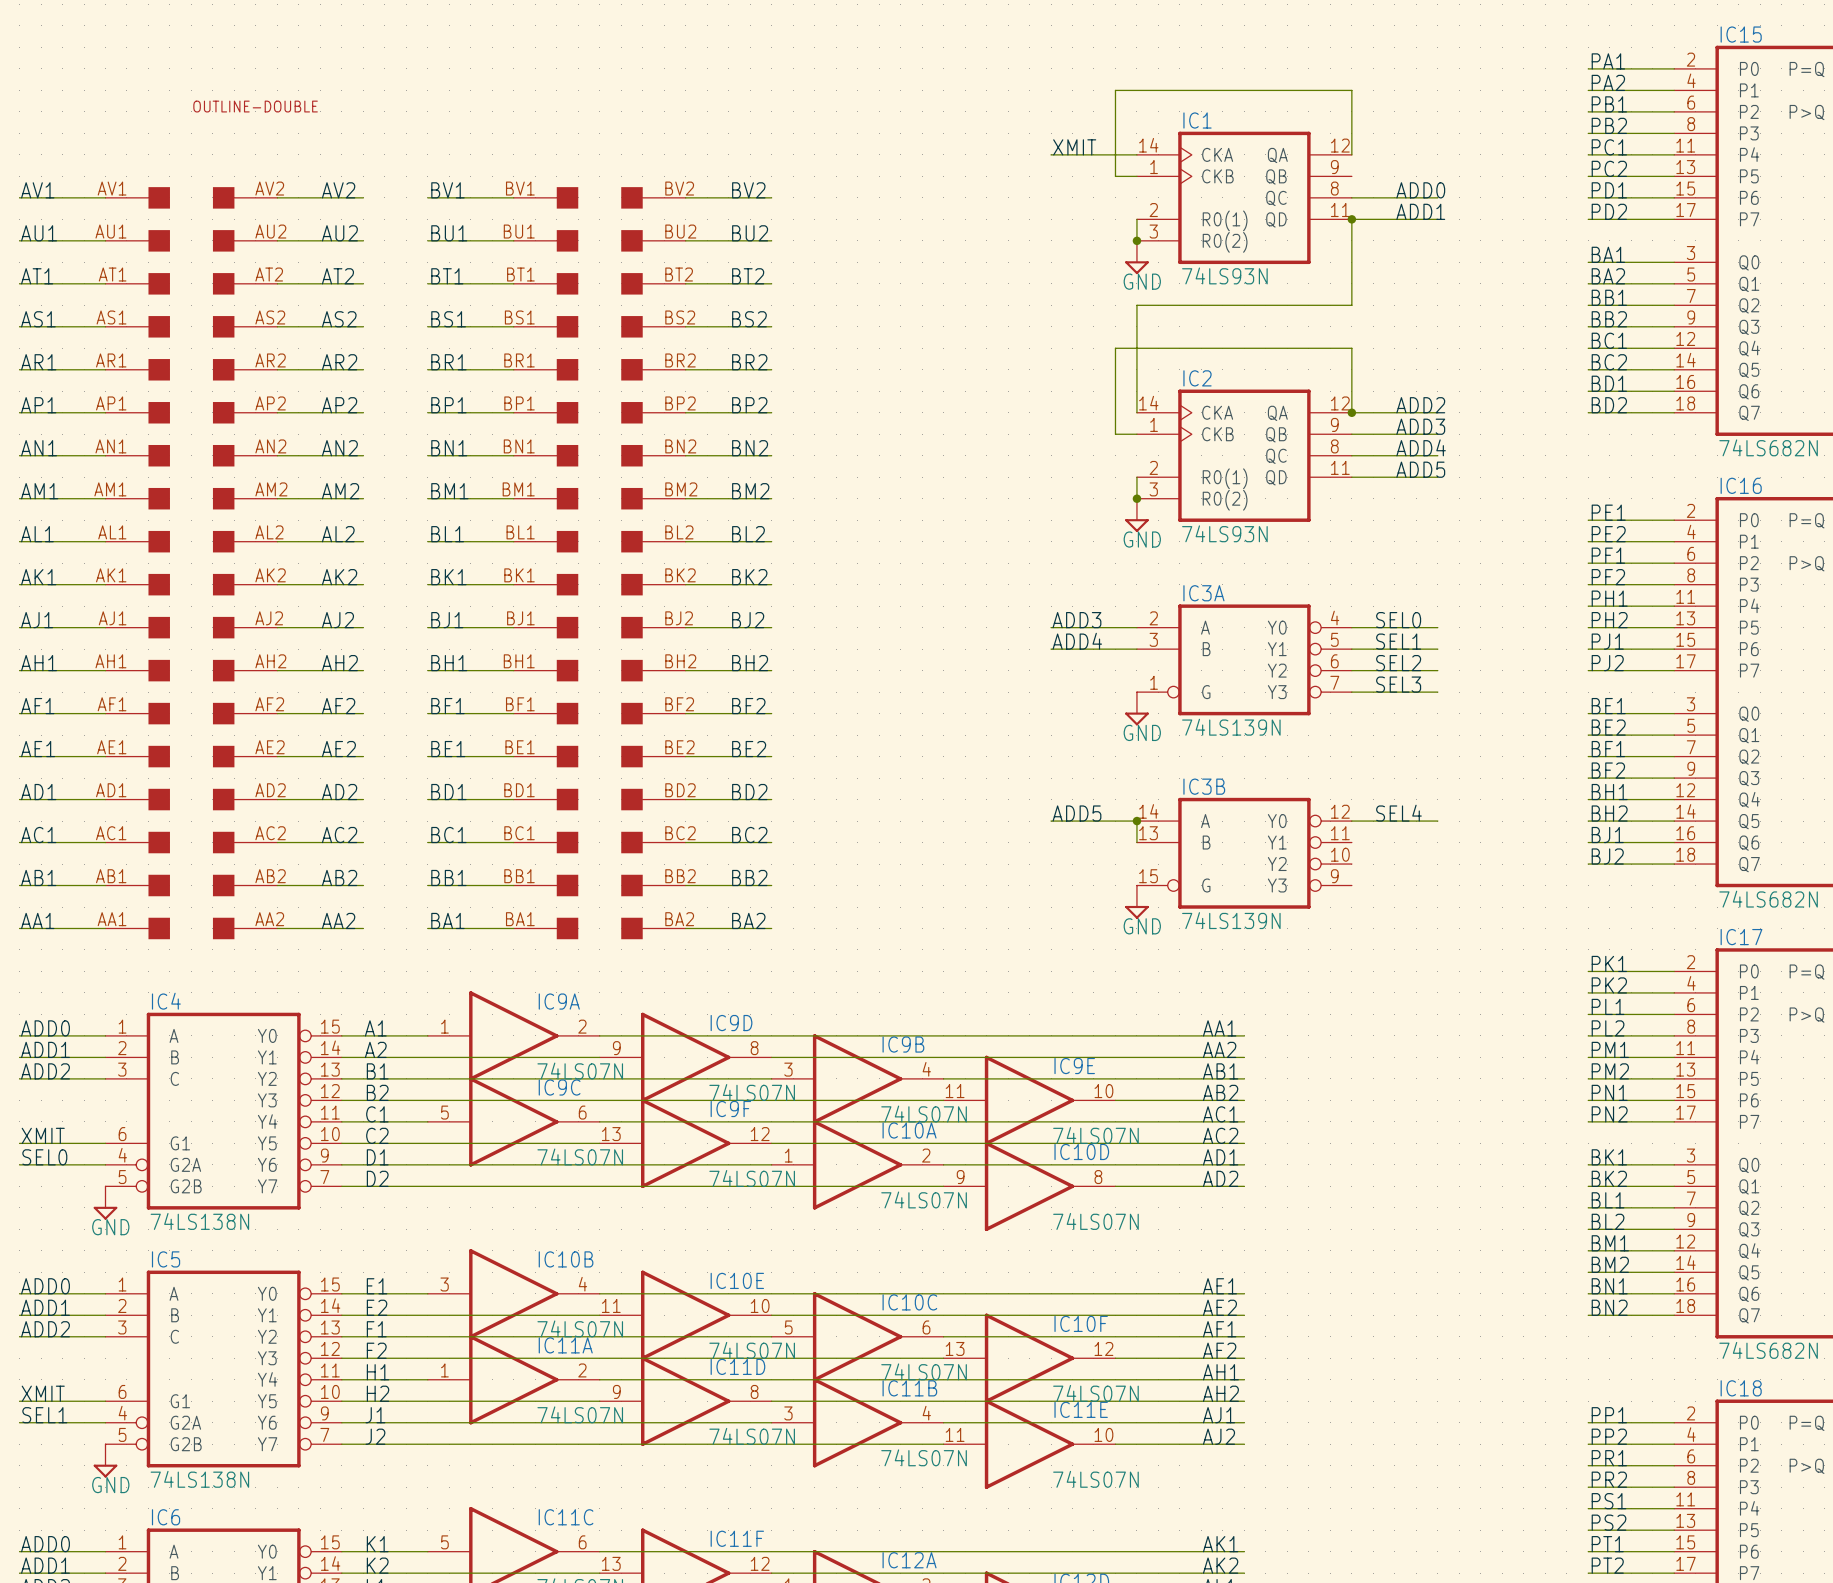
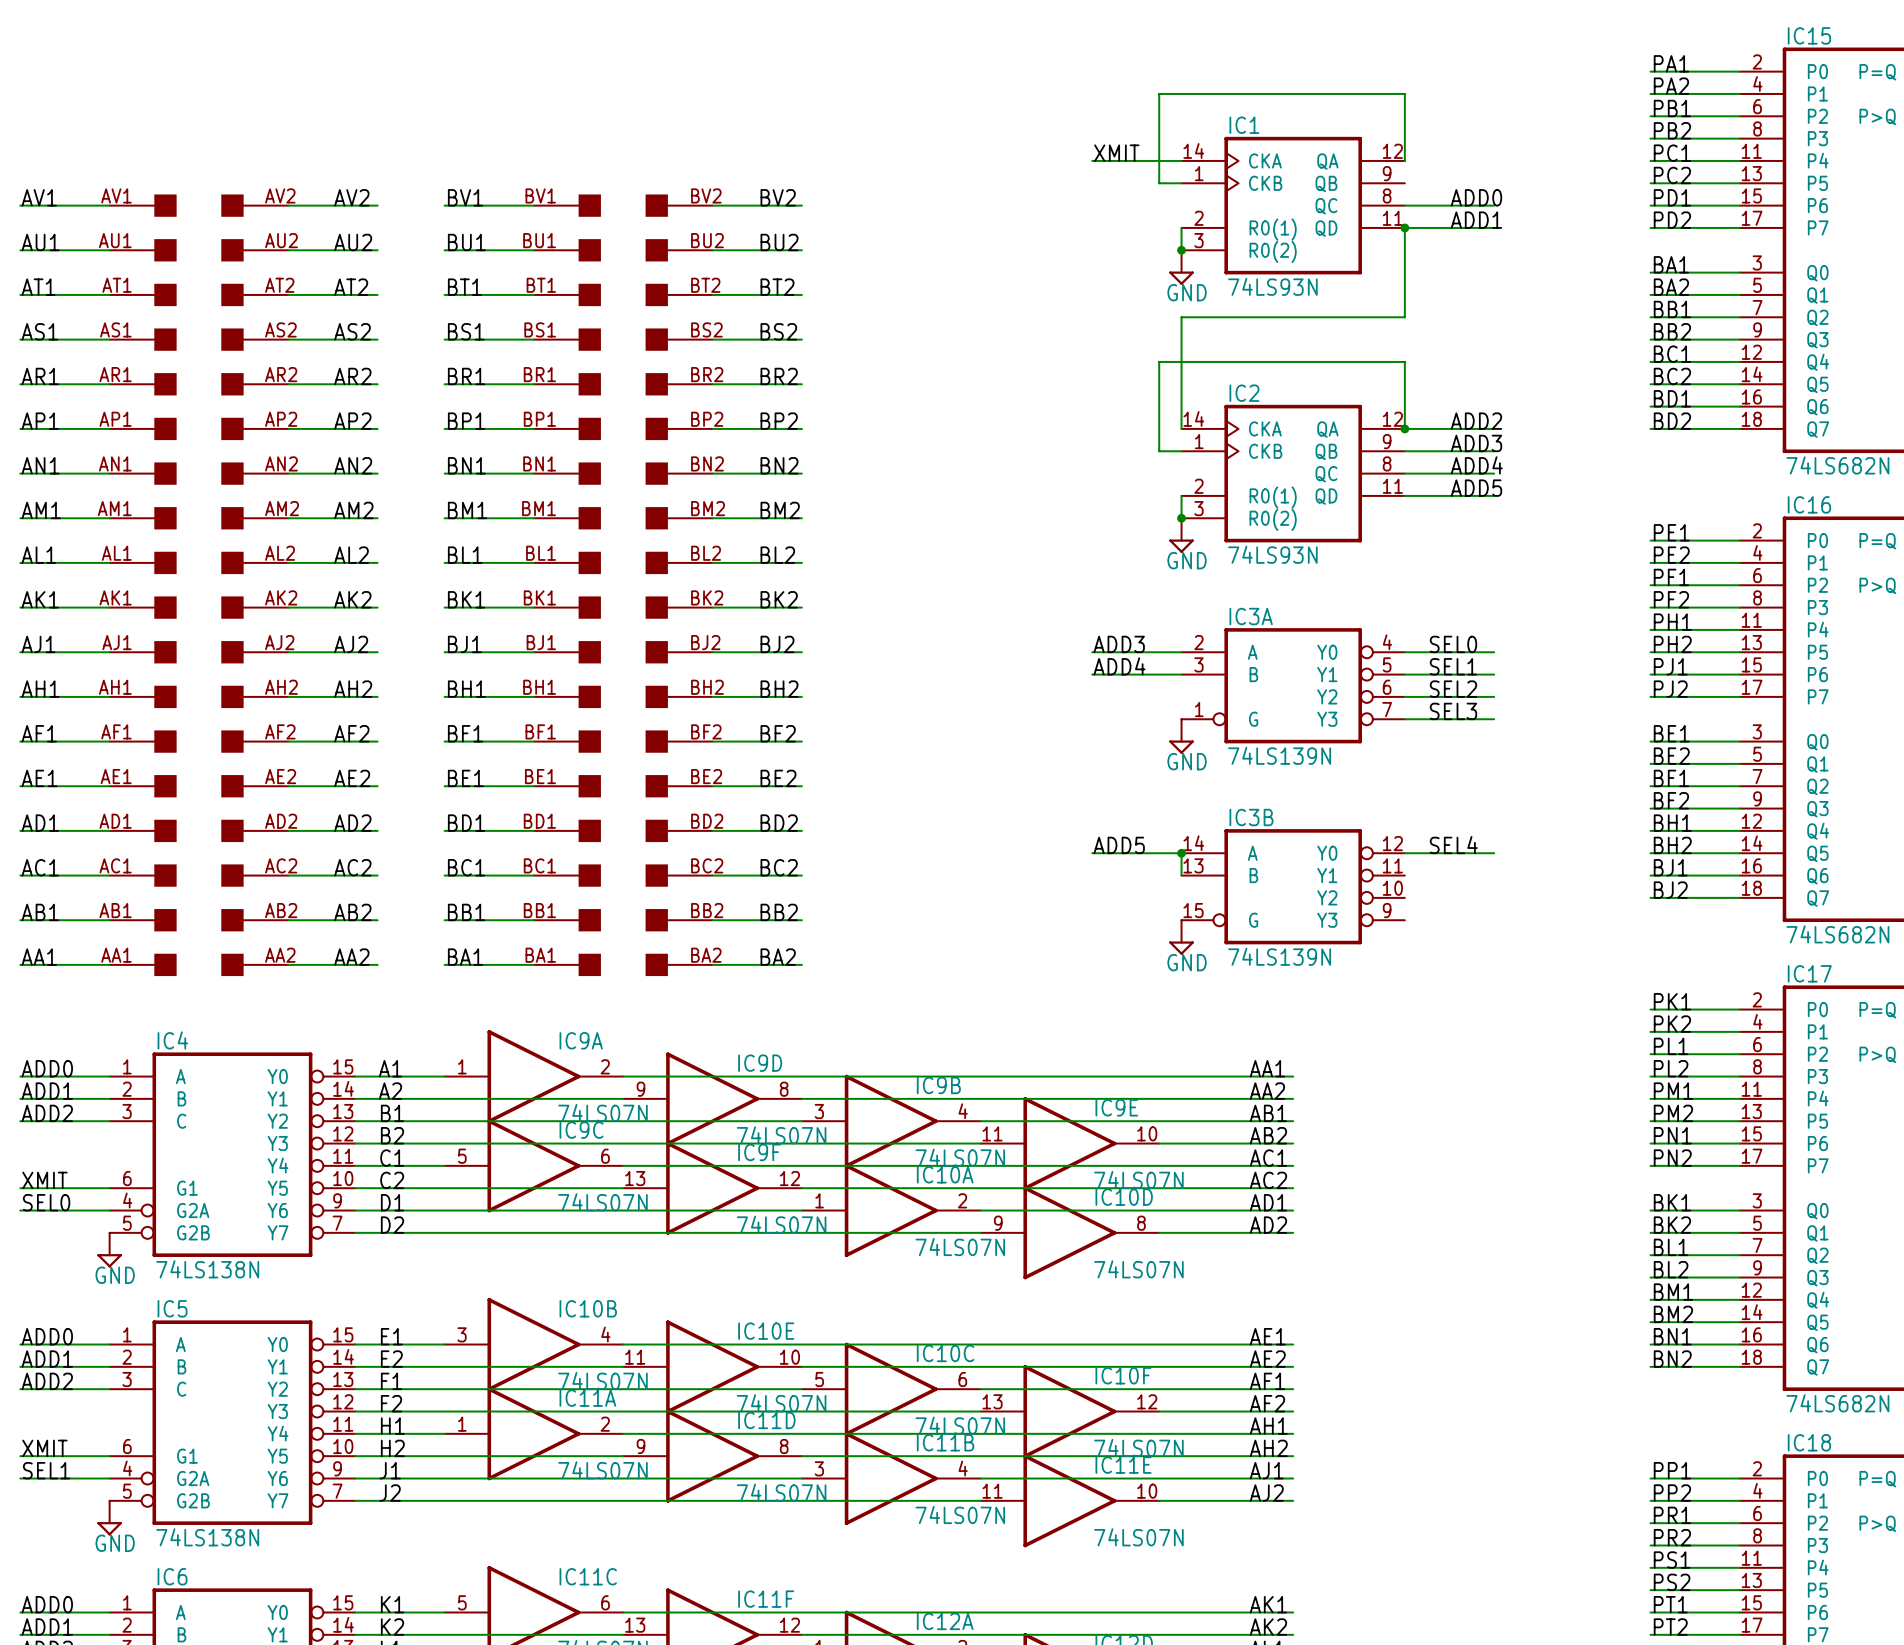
part: OUTLINE-DOUBLE (255, 106) -> none

